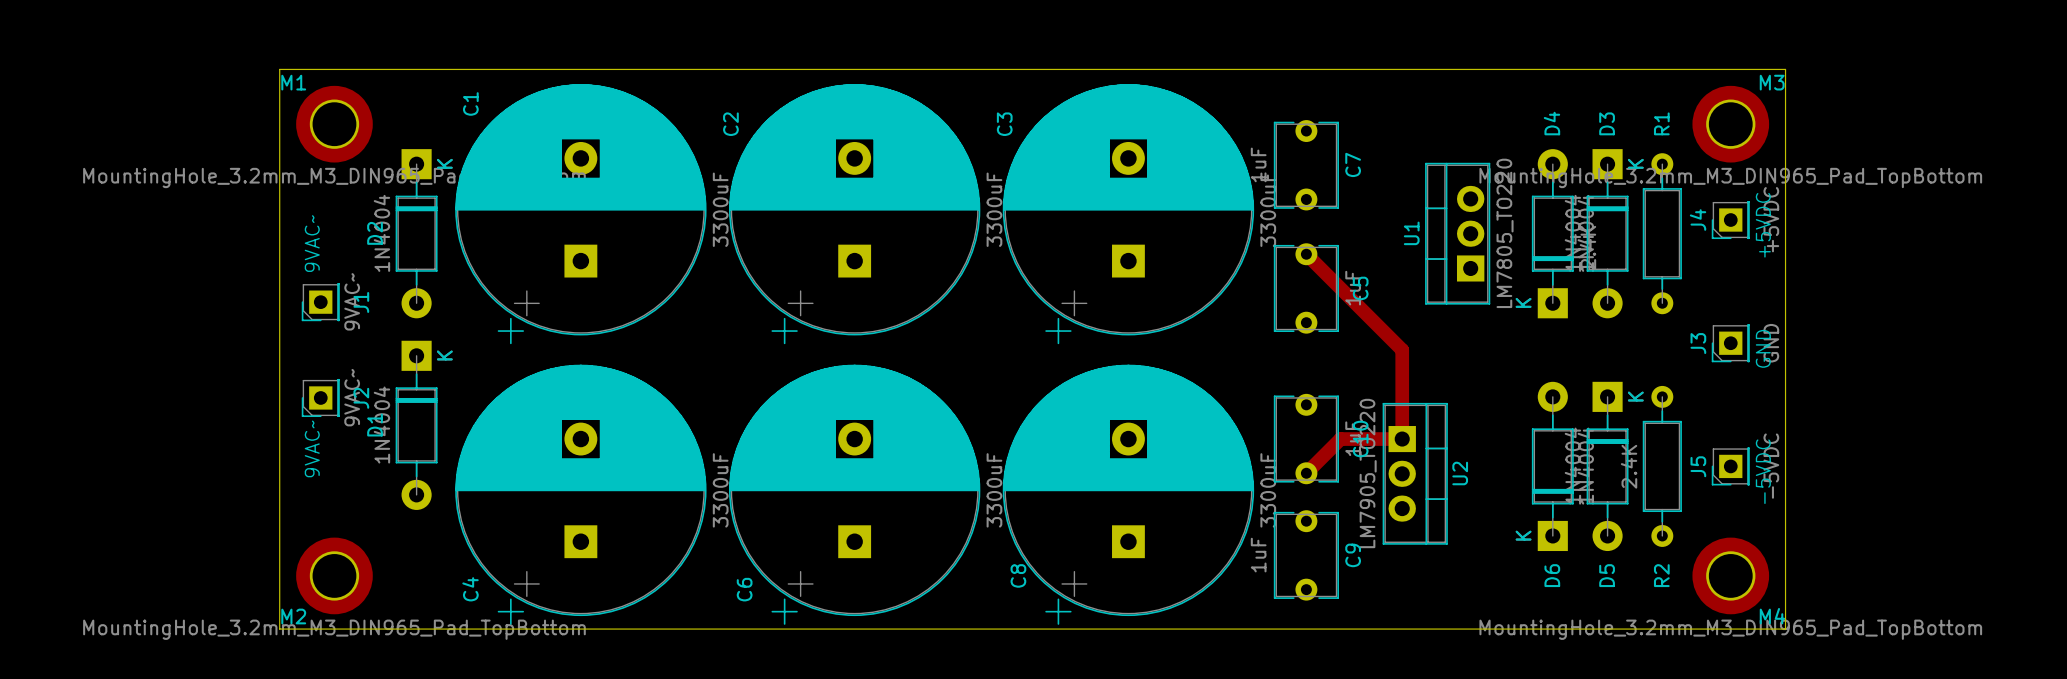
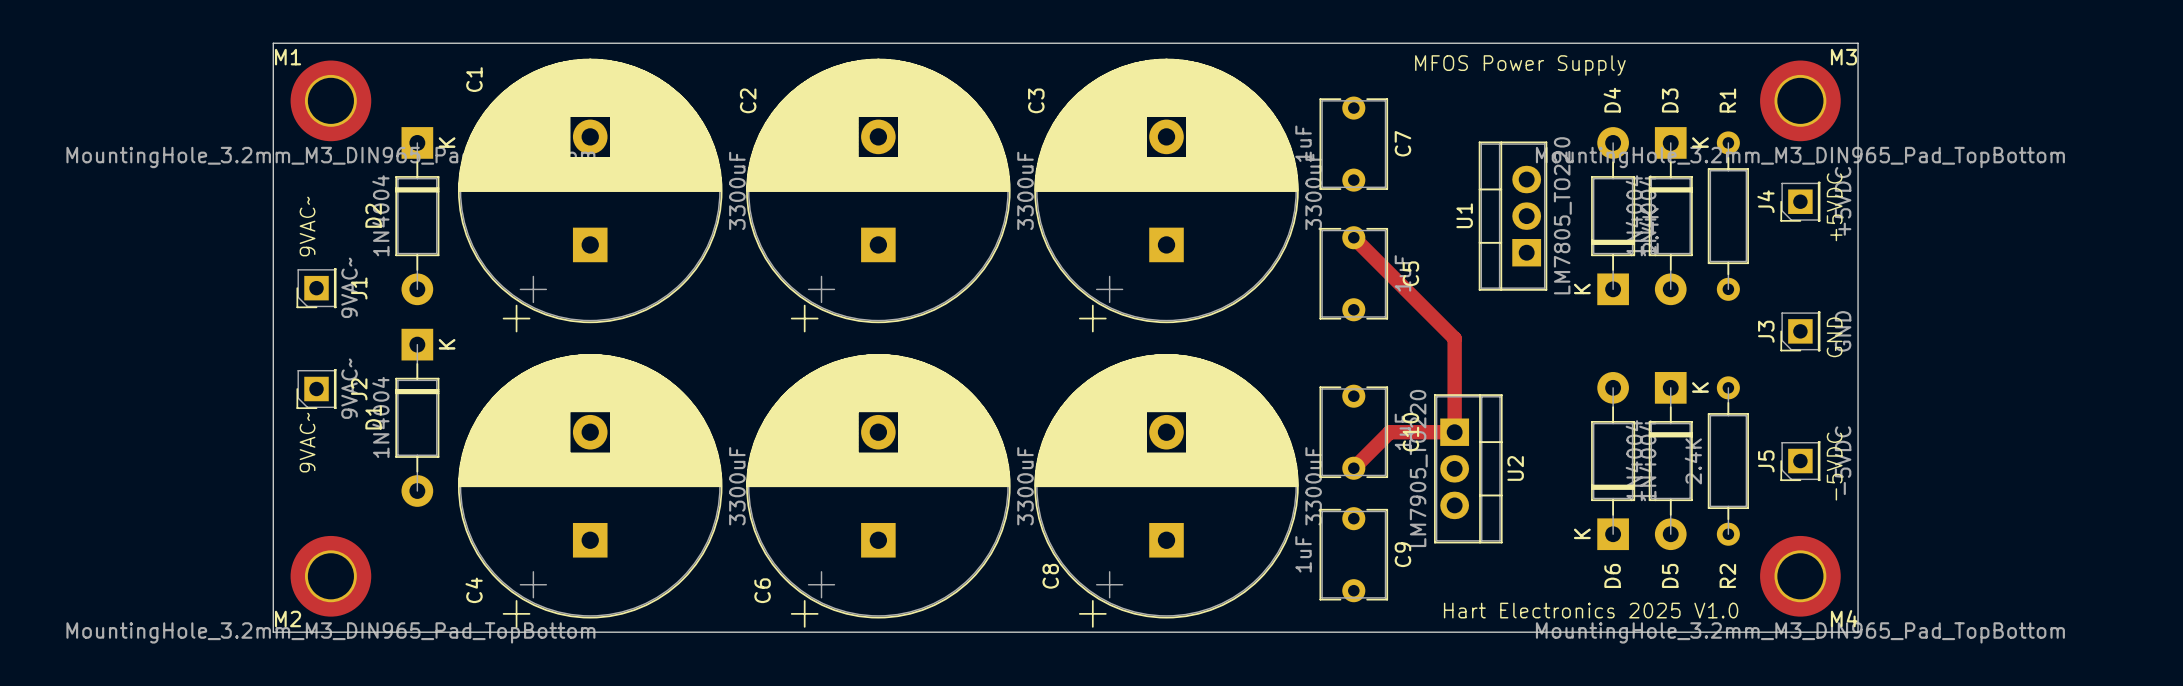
text: none -> MFOS Power Supply (1520, 65)
text: none -> Hart Electronics 2025 V1.0 (1591, 610)

